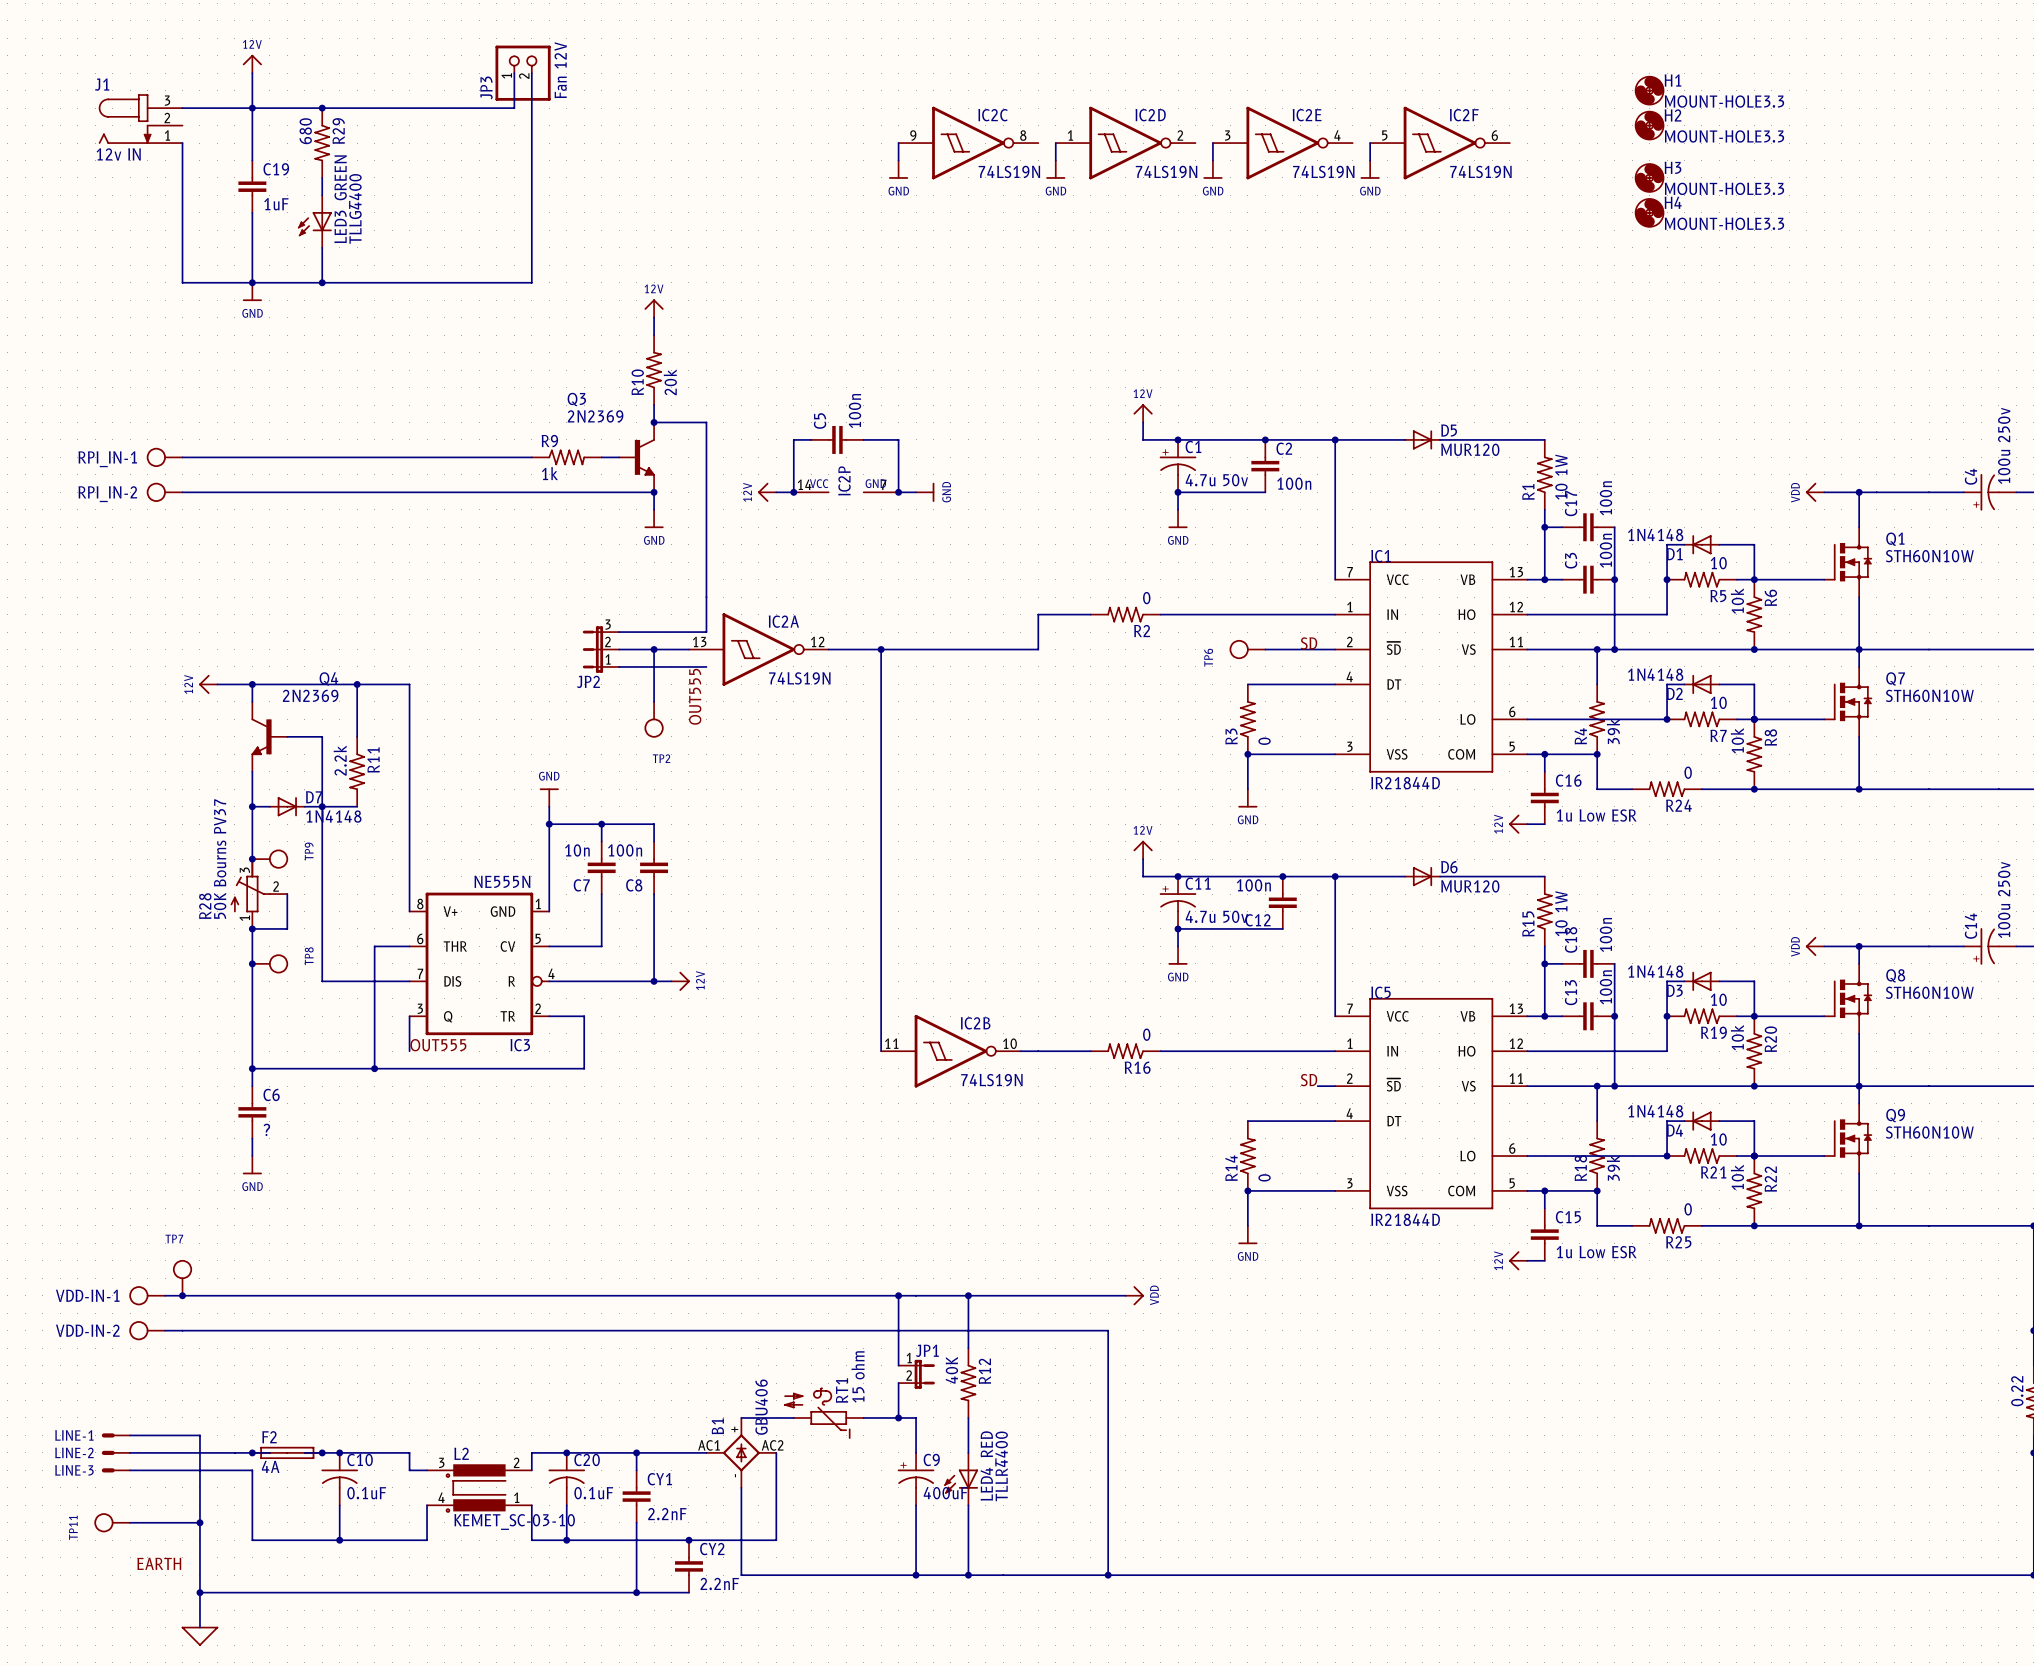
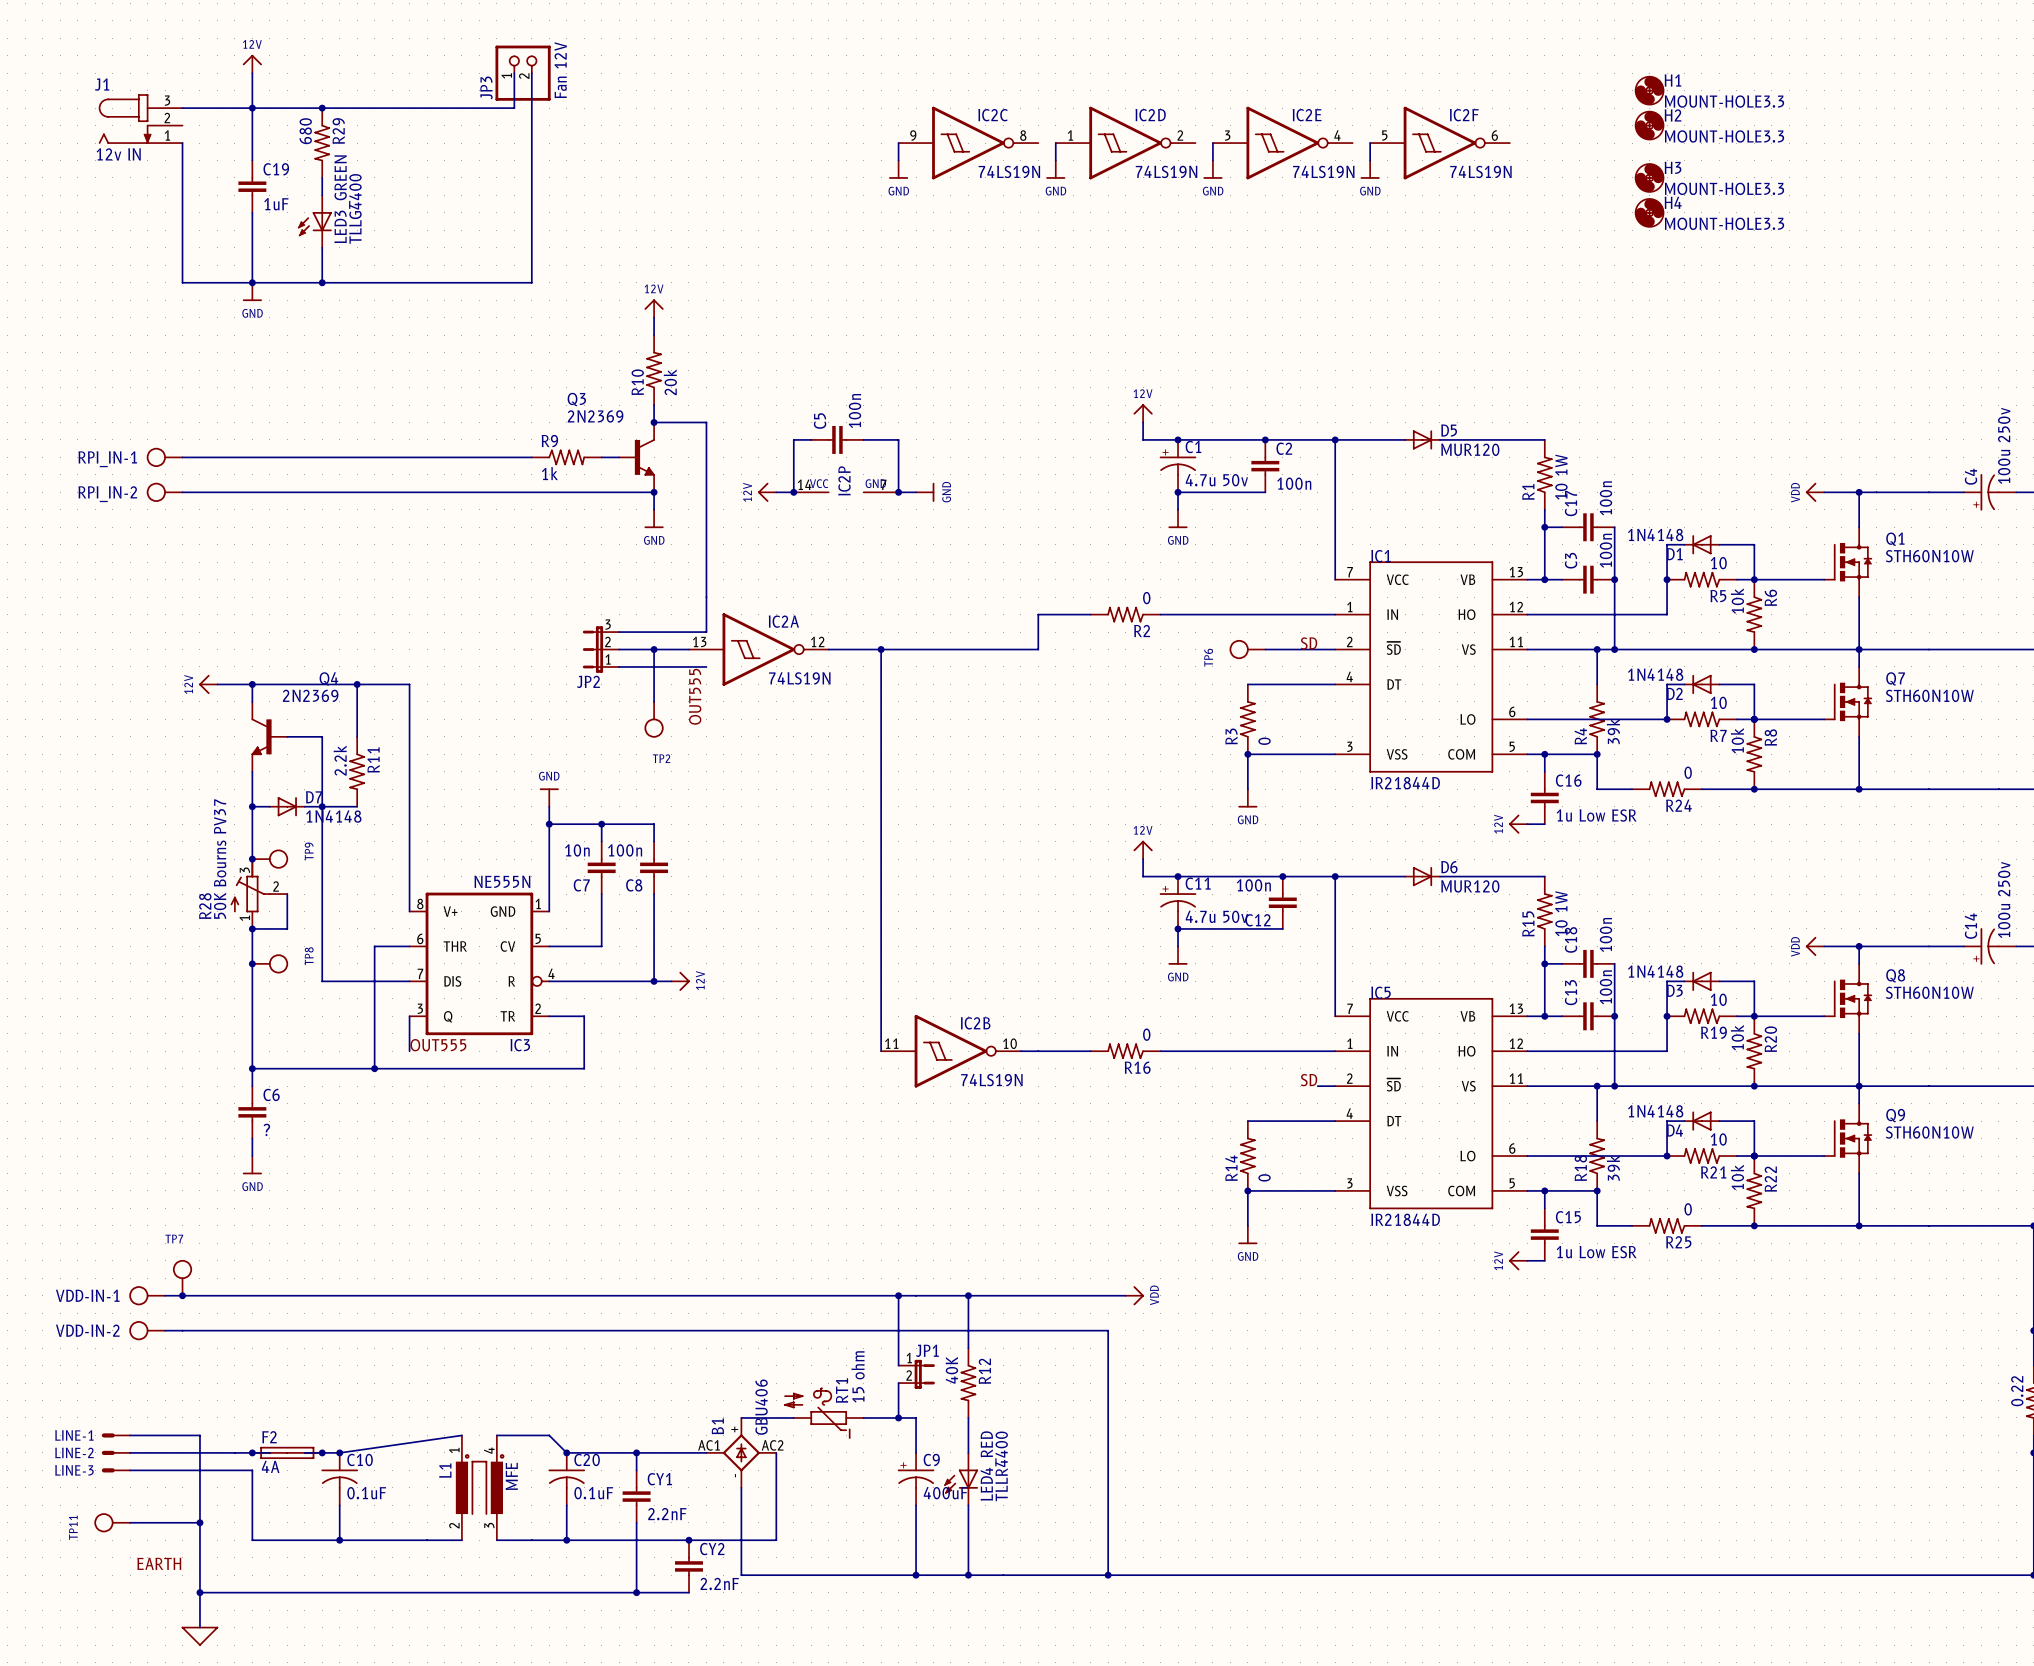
wire: (339, 1452) (409, 1452) (409, 1470) (427, 1470) -> (339, 1452) (461, 1435)
wire: (566, 1452) (531, 1452) (531, 1470) -> (566, 1452) (549, 1435) (496, 1435)
L1: none -> MFE (480, 1487)
L2: KEMET_SC-03-10 (479, 1488) -> none
wire: (427, 1505) (427, 1540) -> (461, 1540) (427, 1540)
wire: (531, 1505) (531, 1540) -> (496, 1540) (531, 1540)

